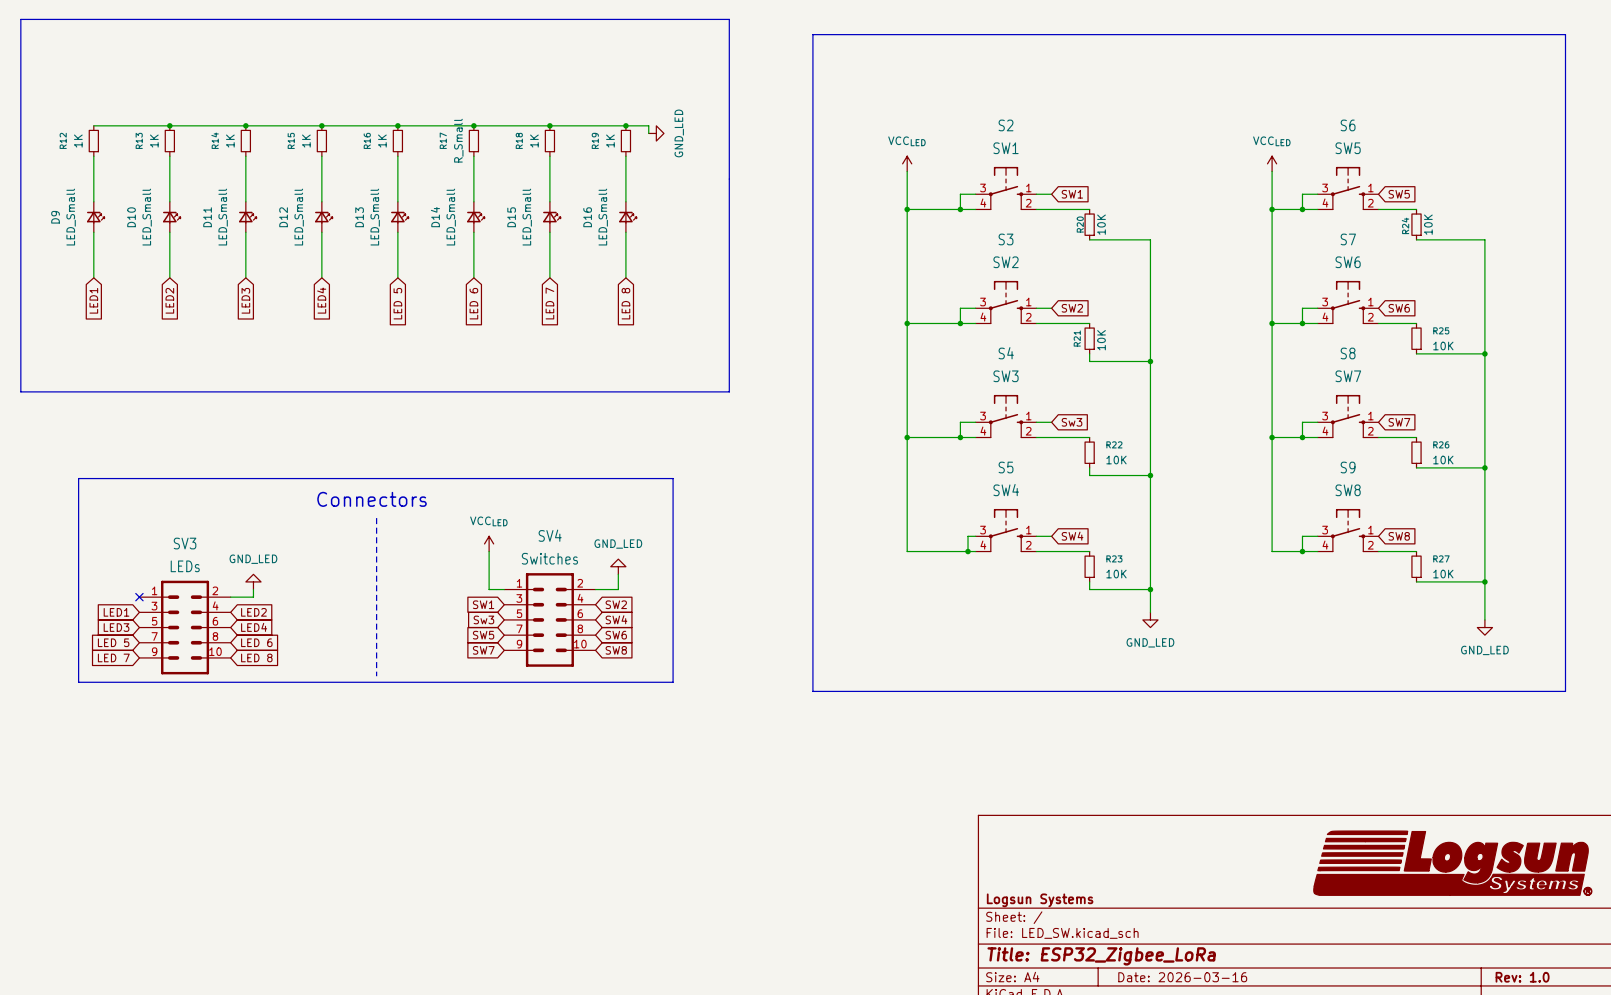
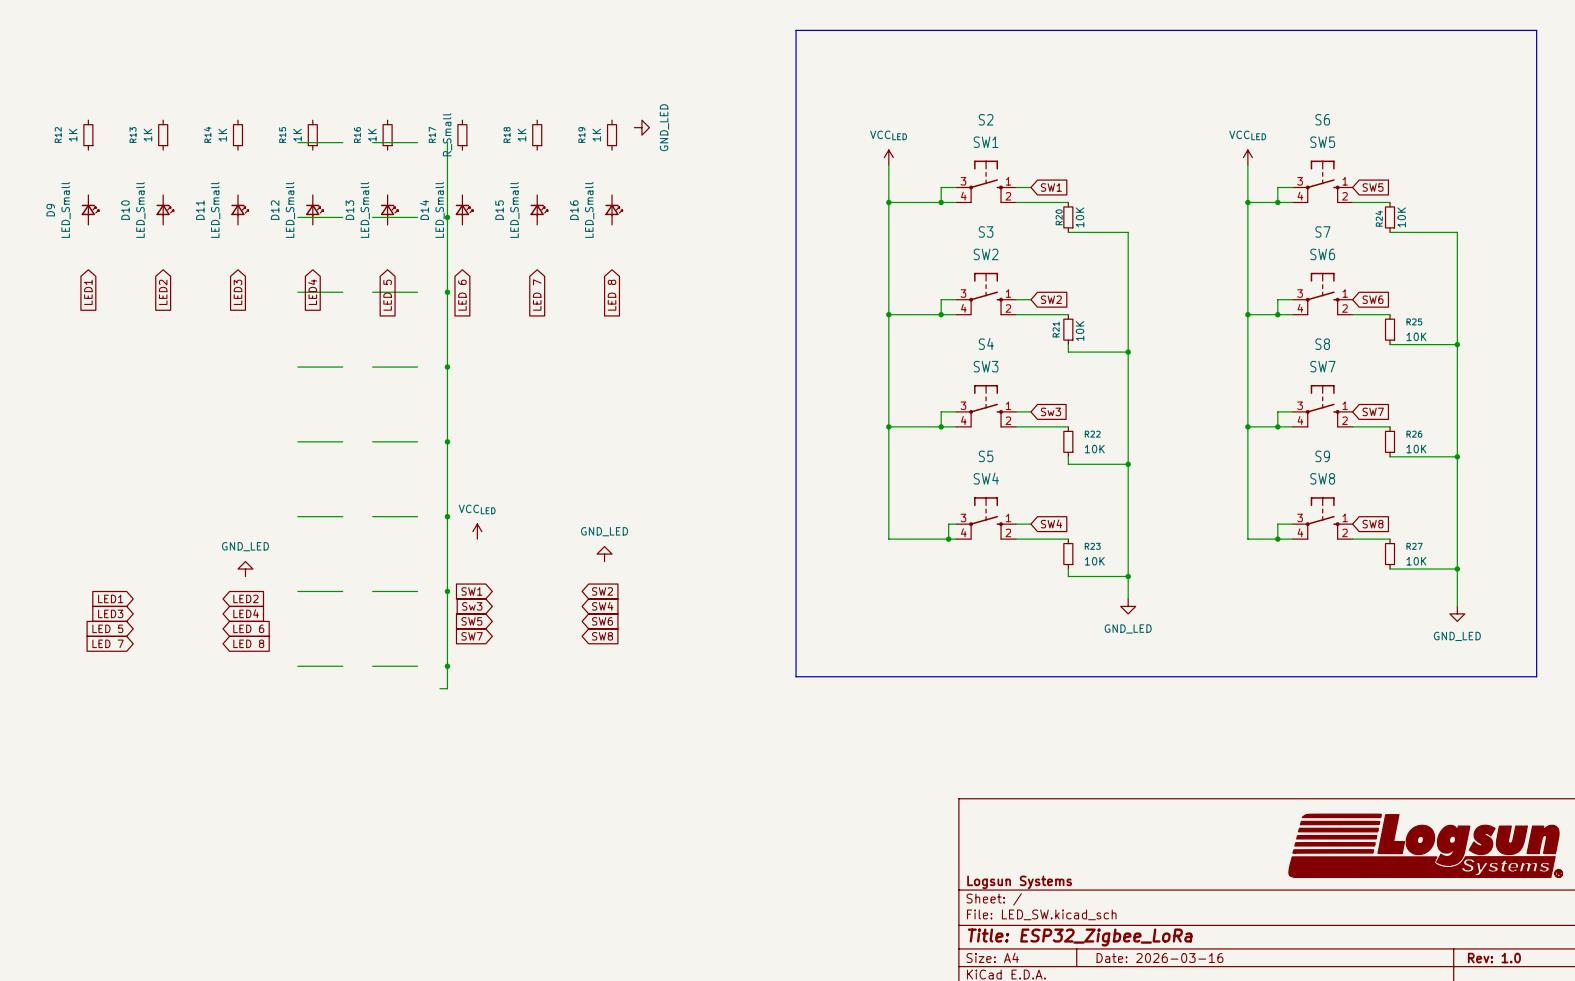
line: (20, 19) (20, 391) (729, 391) (729, 19) (20, 19) -> none
wire: (93, 125) (648, 125) (648, 133) -> none
junction: (169, 125) -> none
junction: (245, 125) -> none
junction: (321, 125) -> none
junction: (397, 125) -> none
junction: (473, 125) -> none
junction: (549, 125) -> none
junction: (625, 125) -> none
wire: none -> (297, 142) (342, 142)
wire: none -> (372, 142) (417, 142)
wire: none -> (447, 142) (447, 688) (439, 688)
wire: (93, 156) (93, 201) -> none
wire: (169, 156) (169, 201) -> none
wire: (245, 156) (245, 201) -> none
wire: (321, 156) (321, 201) -> none
wire: (397, 156) (397, 201) -> none
wire: (473, 156) (473, 201) -> none
wire: (549, 156) (549, 201) -> none
wire: (625, 156) (625, 201) -> none
wire: none -> (297, 217) (342, 217)
wire: none -> (372, 217) (417, 217)
junction: none -> (447, 217)
wire: (93, 232) (93, 277) -> none
wire: (169, 232) (169, 277) -> none
wire: (245, 232) (245, 277) -> none
wire: (321, 232) (321, 277) -> none
wire: (397, 232) (397, 277) -> none
wire: (473, 232) (473, 277) -> none
wire: (549, 232) (549, 277) -> none
wire: (625, 232) (625, 277) -> none
wire: none -> (297, 292) (342, 292)
wire: none -> (372, 292) (417, 292)
junction: none -> (447, 292)
wire: none -> (297, 367) (342, 367)
wire: none -> (372, 367) (417, 367)
junction: none -> (447, 367)
wire: none -> (297, 441) (342, 441)
wire: none -> (372, 441) (417, 441)
junction: none -> (447, 441)
line: (78, 478) (673, 478) (673, 682) (78, 682) (78, 478) -> none
text: Connectors (372, 499) -> none
line: (376, 518) (376, 676) -> none
wire: none -> (297, 516) (342, 516)
wire: none -> (372, 516) (417, 516)
junction: none -> (447, 516)
wire: (489, 551) (489, 589) (504, 589) -> none
wire: (618, 574) (618, 589) (595, 589) -> none
wire: (253, 589) (253, 597) (230, 597) -> none
no-connect mark: (139, 597) -> none
wire: none -> (297, 591) (342, 591)
wire: none -> (372, 591) (417, 591)
junction: none -> (447, 591)
SV4: Switches (549, 619) -> none
SV3: LEDs (185, 627) -> none
wire: none -> (297, 666) (342, 666)
wire: none -> (372, 666) (417, 666)
junction: none -> (447, 666)

